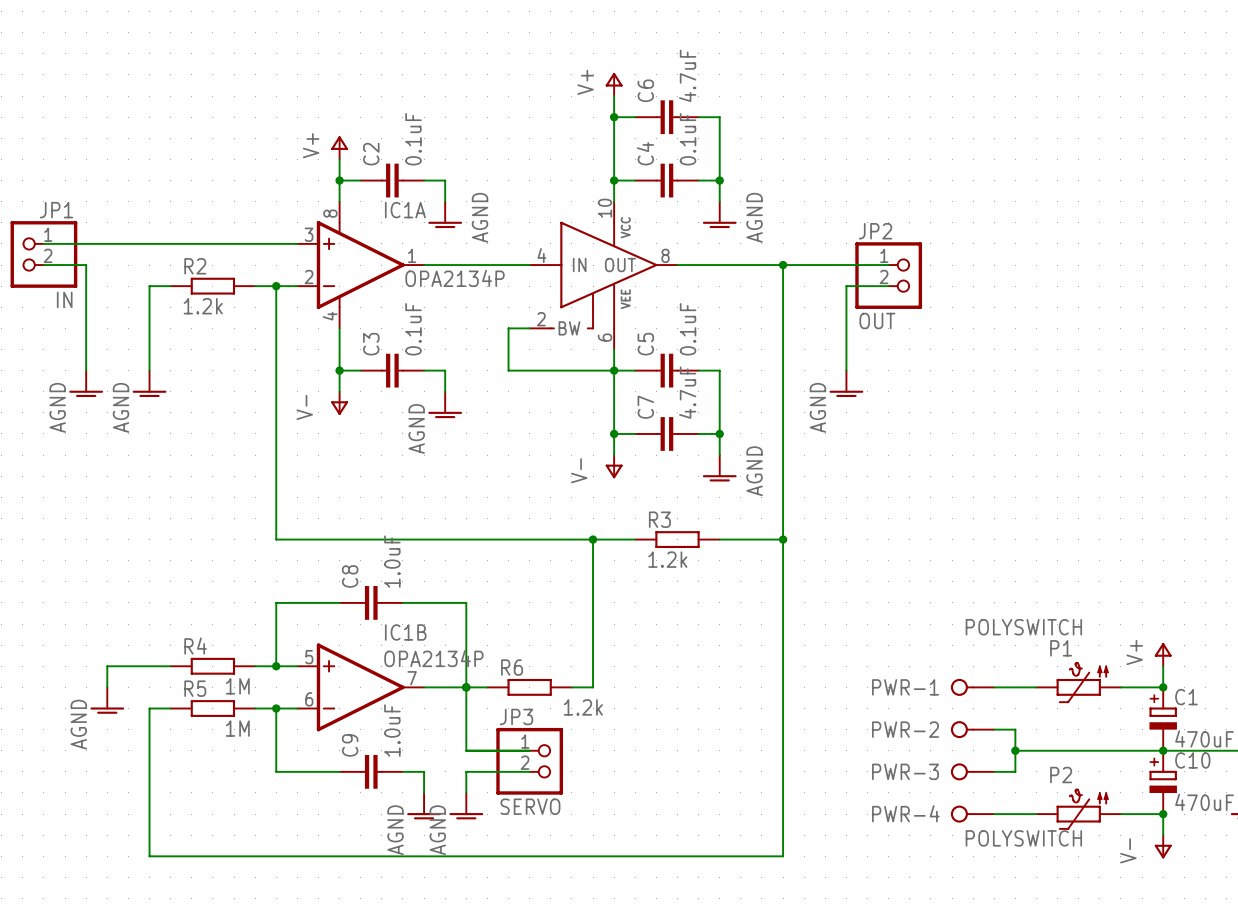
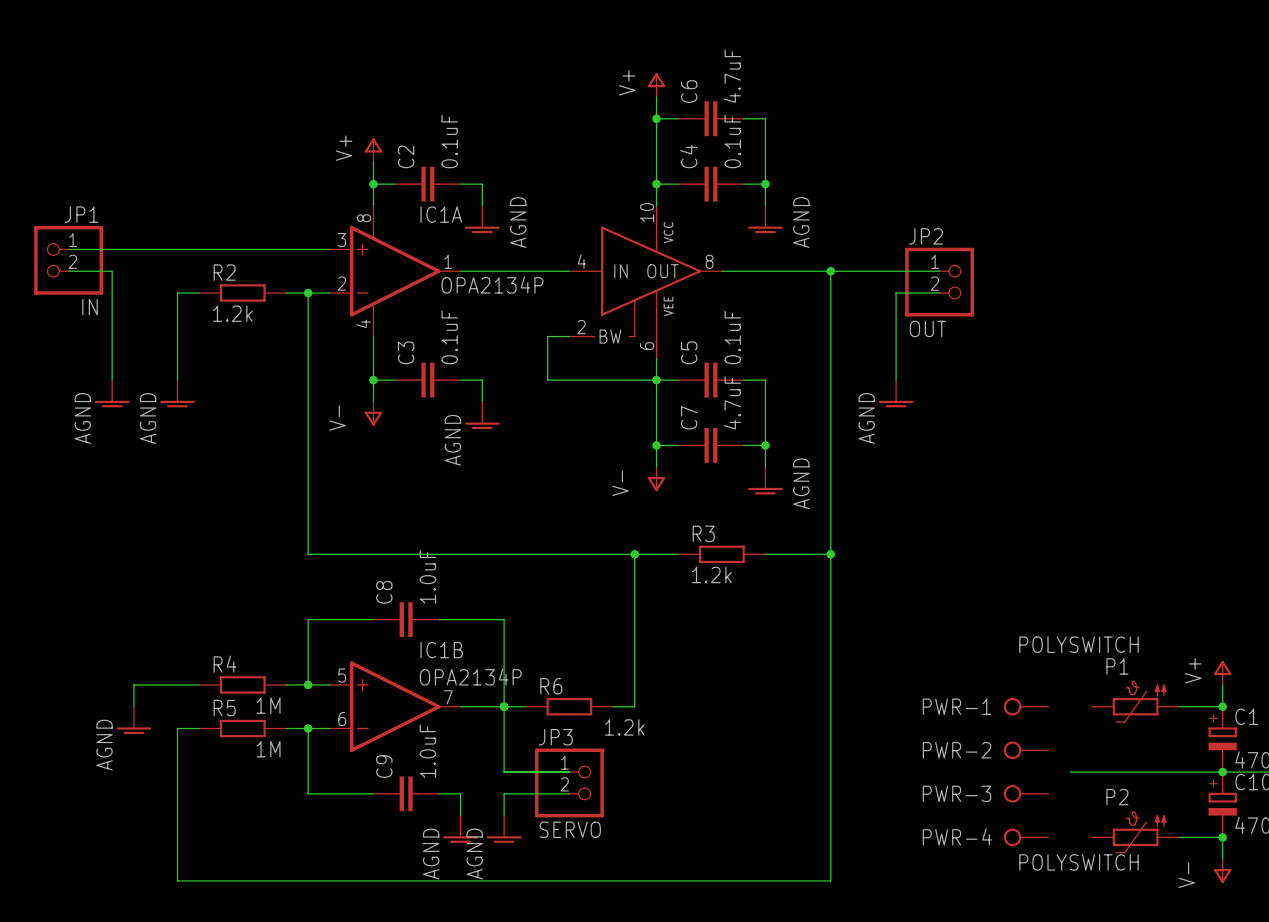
wire: (994, 687) (1036, 687) -> none
wire: (994, 729) (1015, 729) (1015, 771) (994, 771) -> none
junction: (1015, 750) -> none
wire: (994, 814) (1036, 814) -> none

